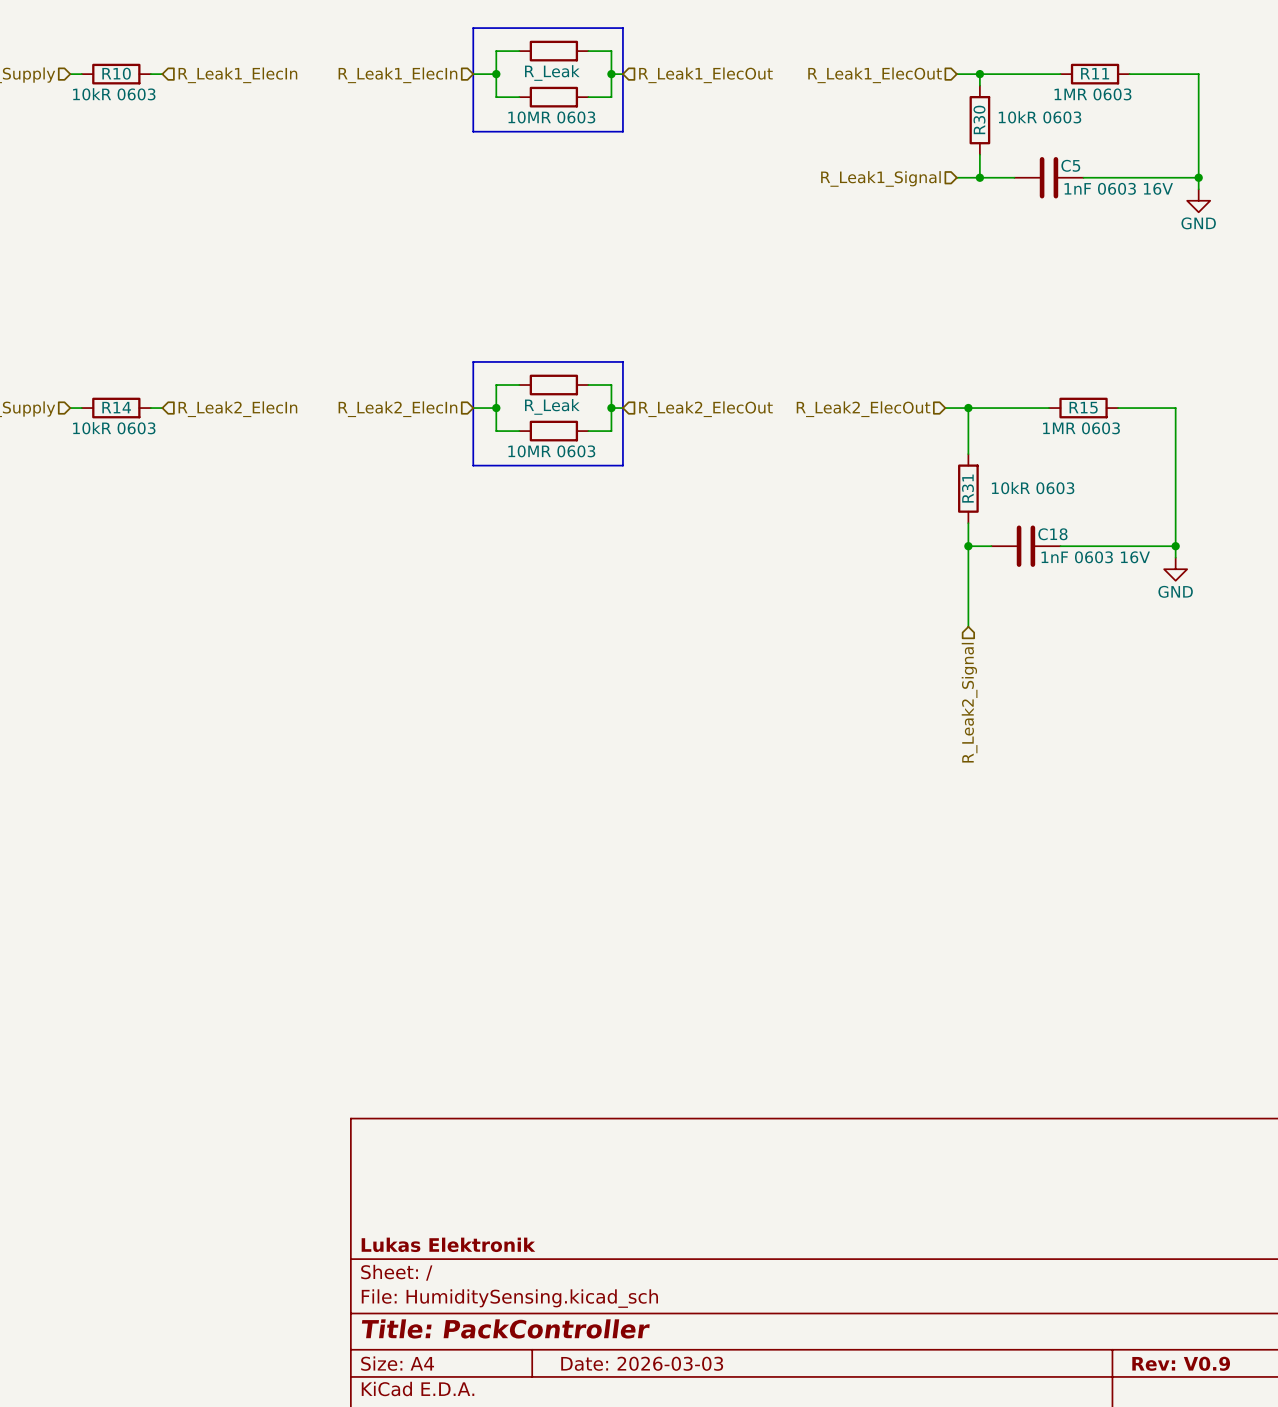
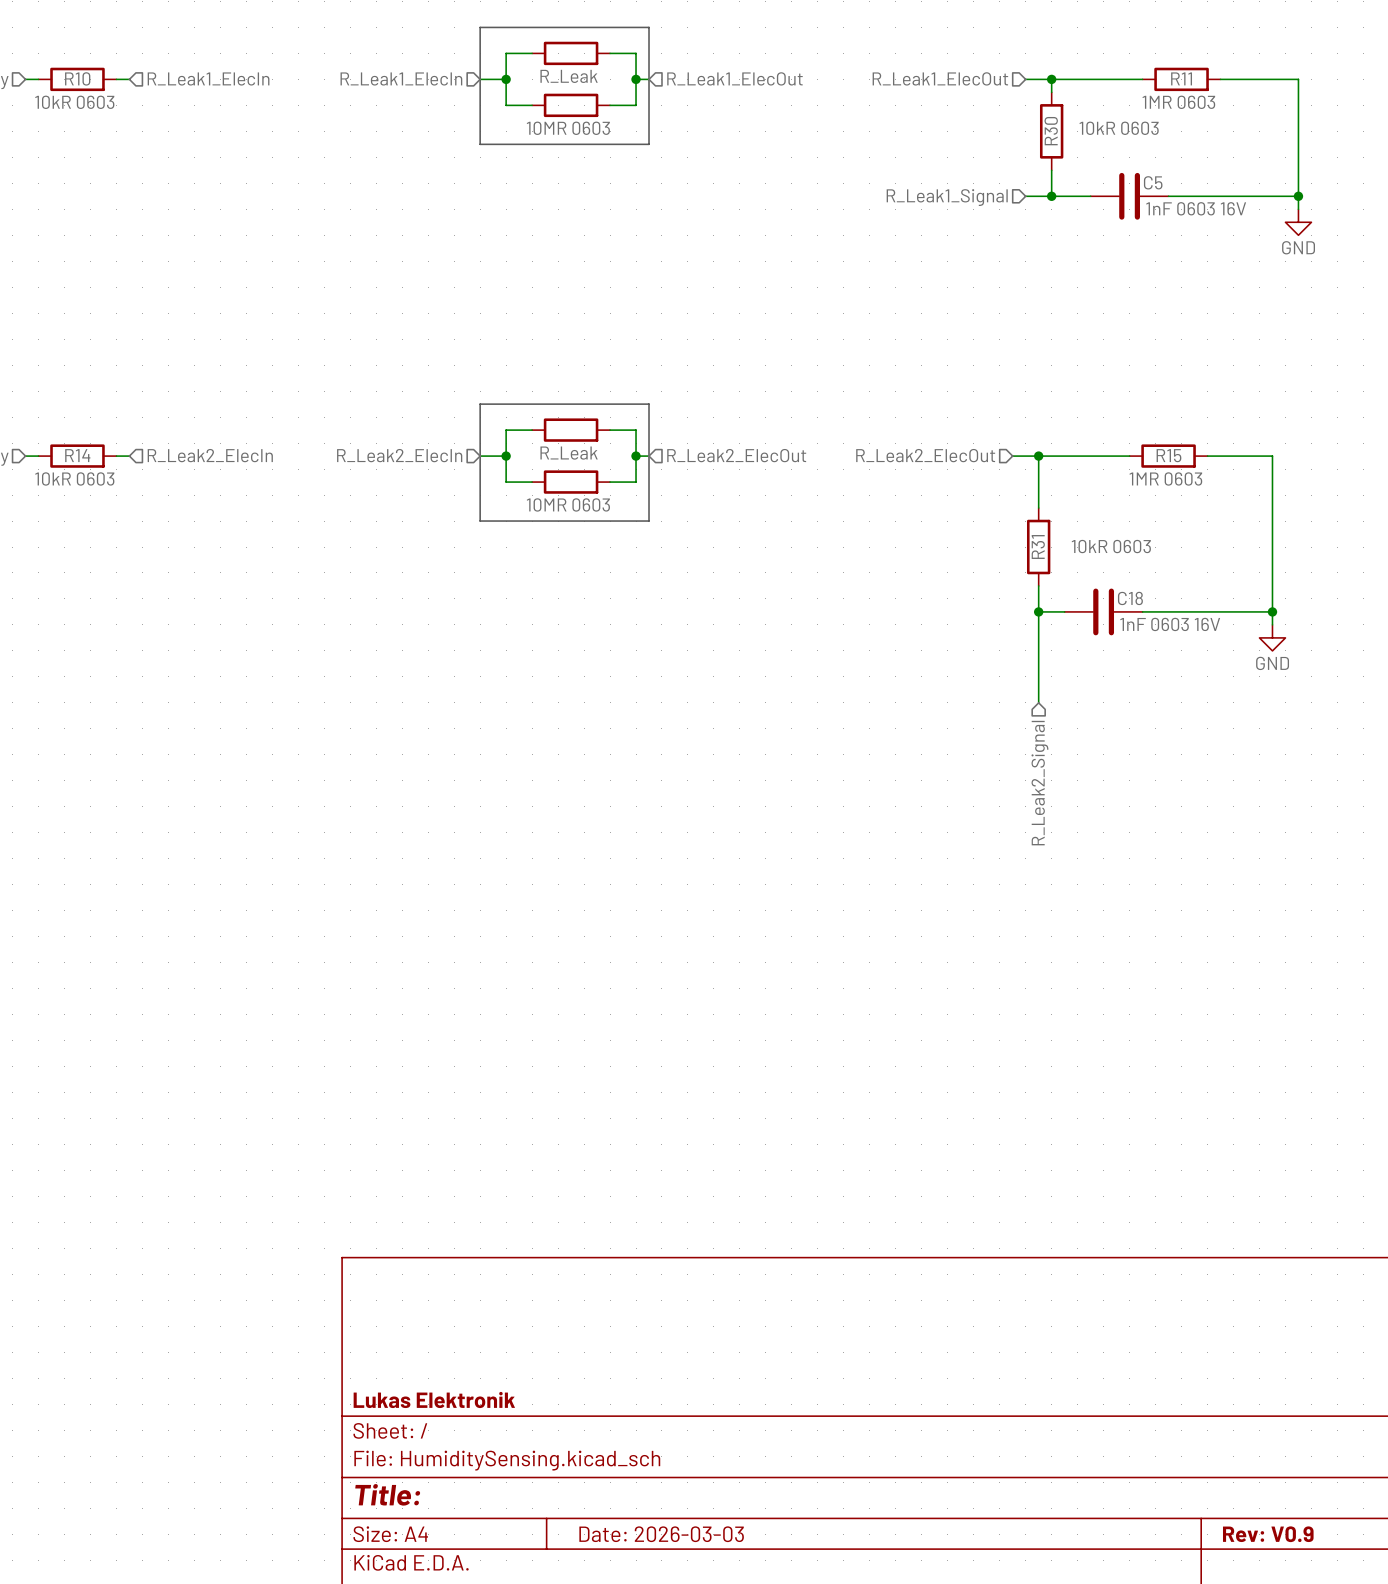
title block: Title: PackController (505, 1328) -> Title: (387, 1494)

